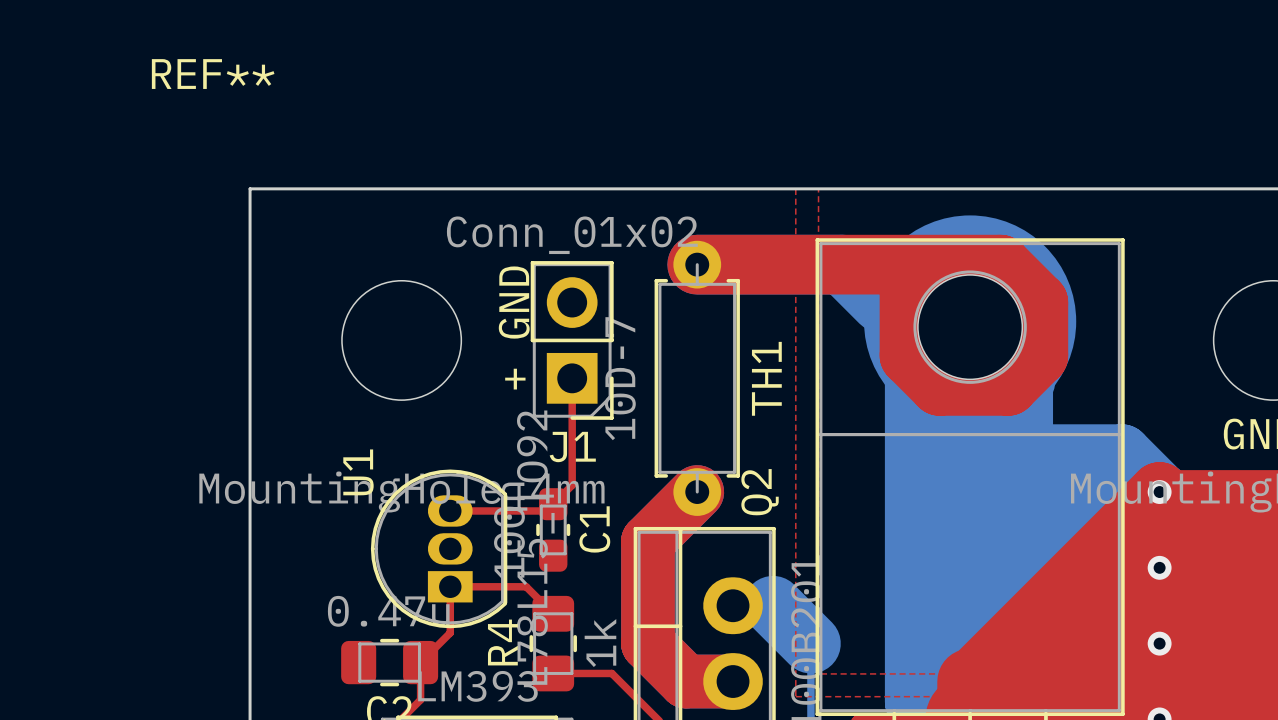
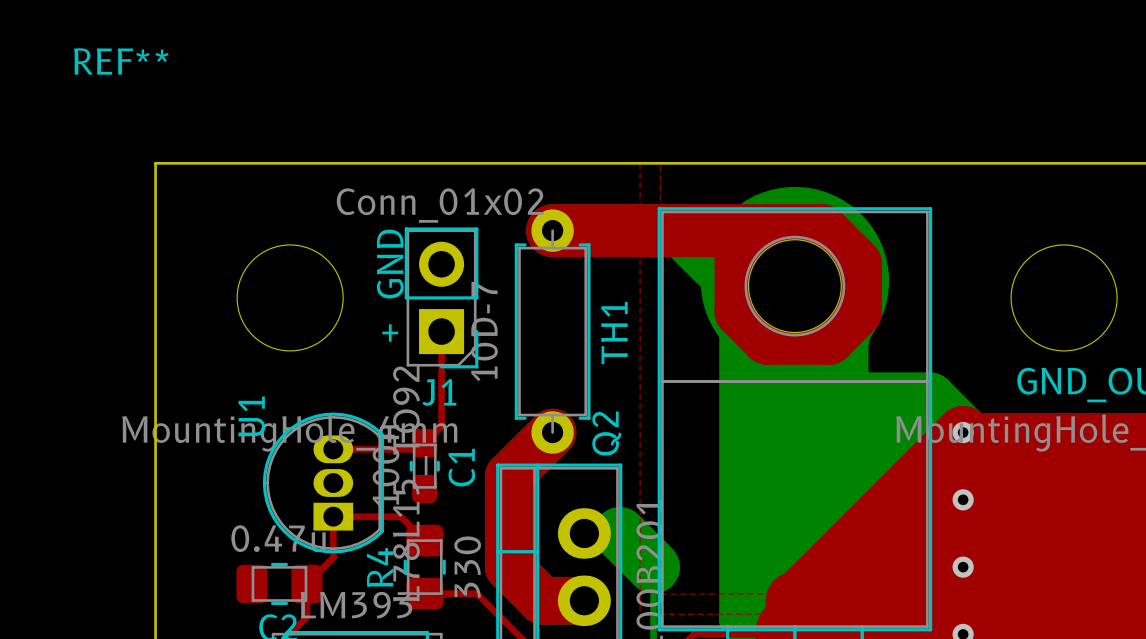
R4 value: 1k (600, 643) -> 330 (467, 567)

